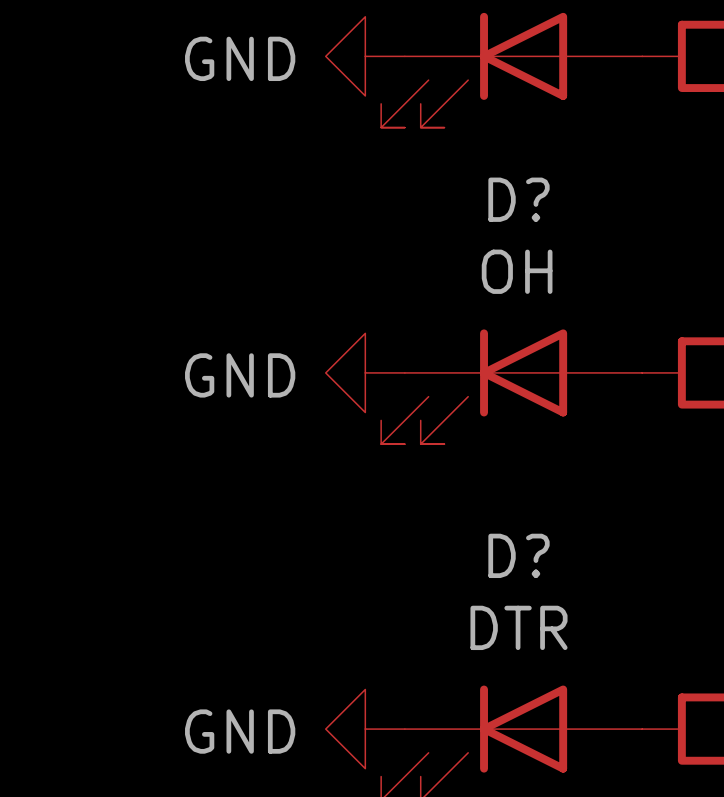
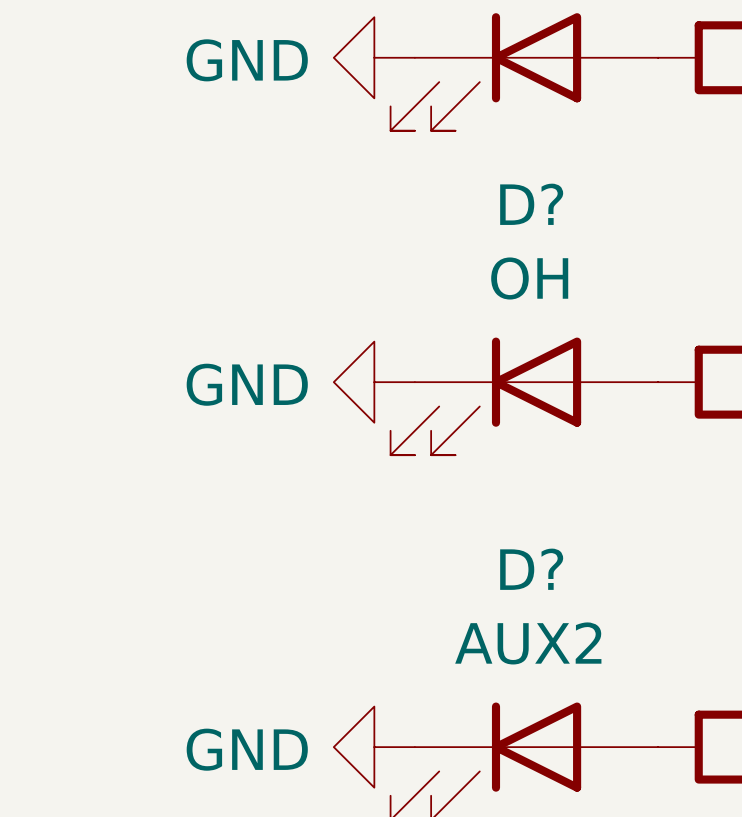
D? value: DTR (519, 627) -> AUX2 (528, 643)

